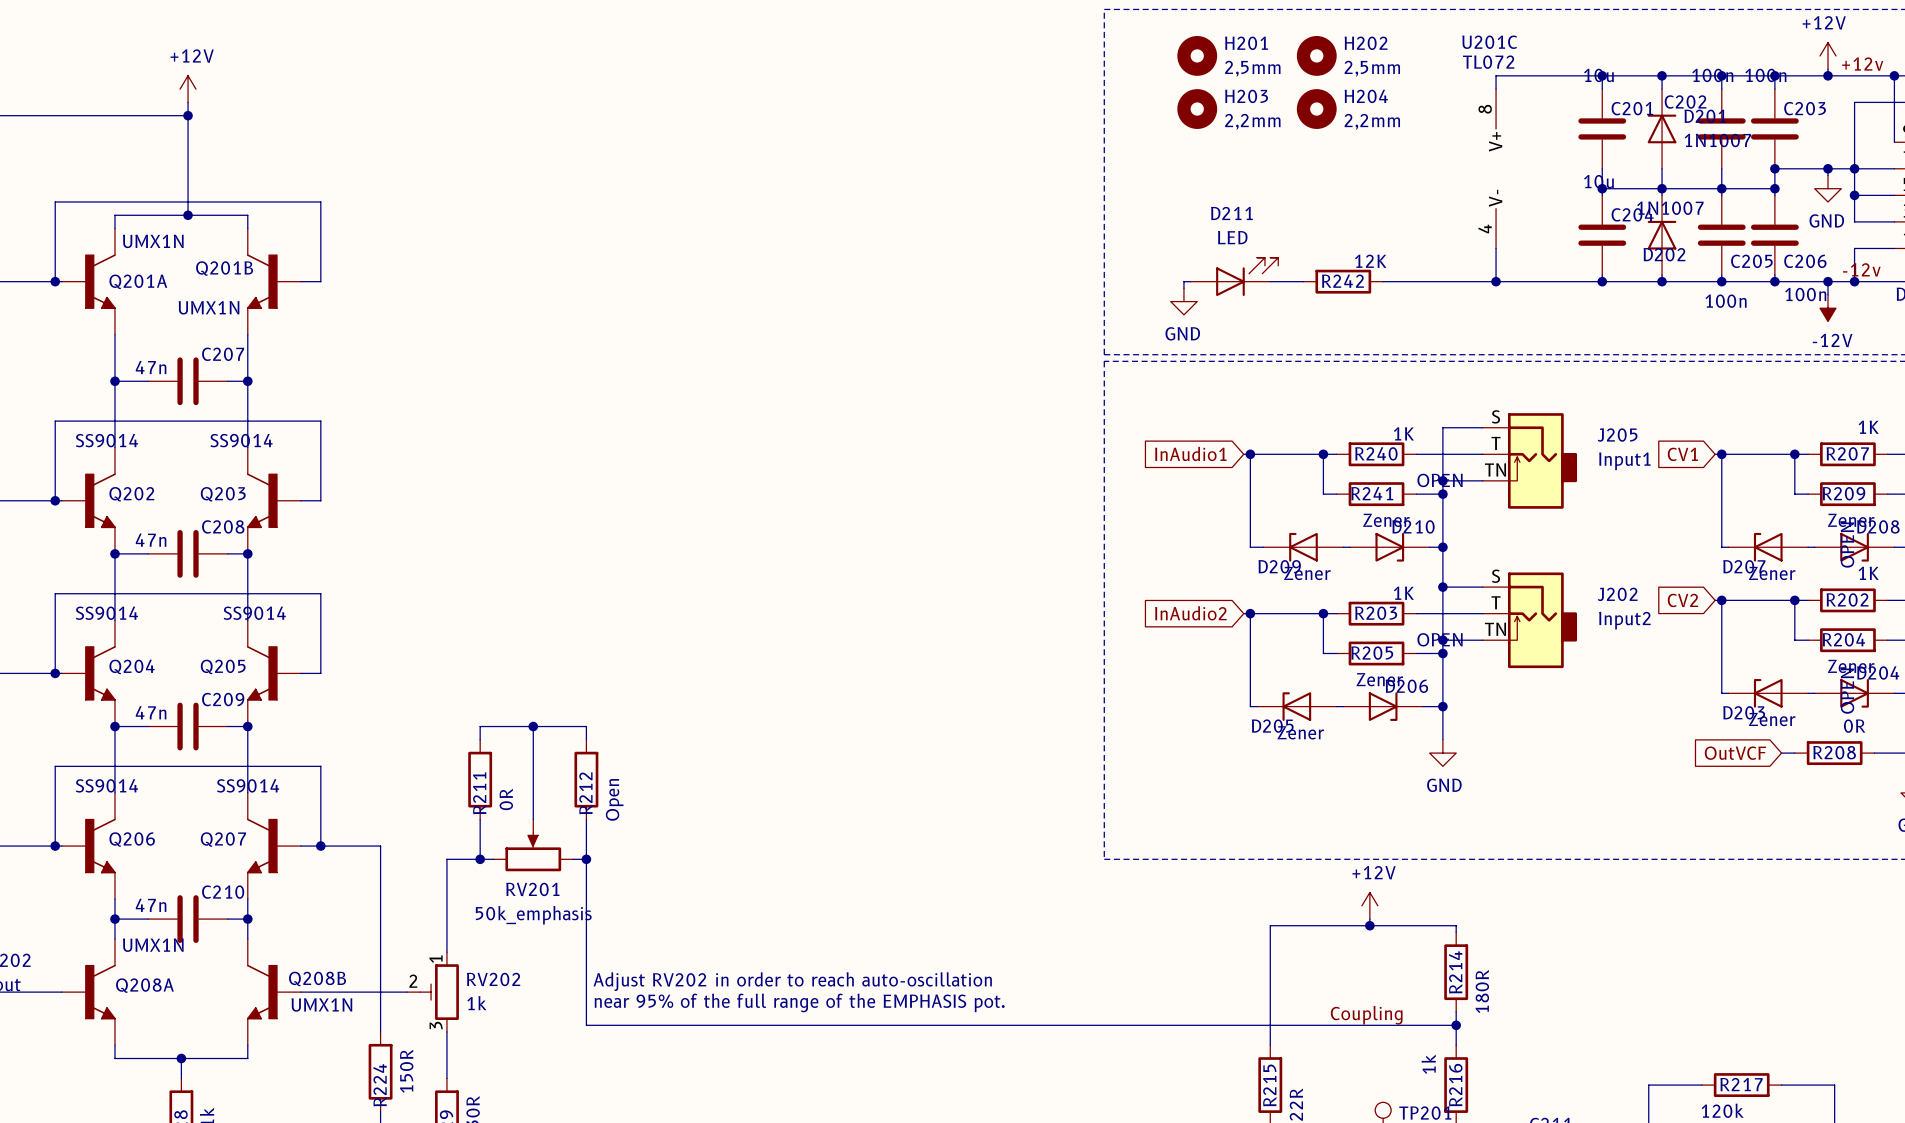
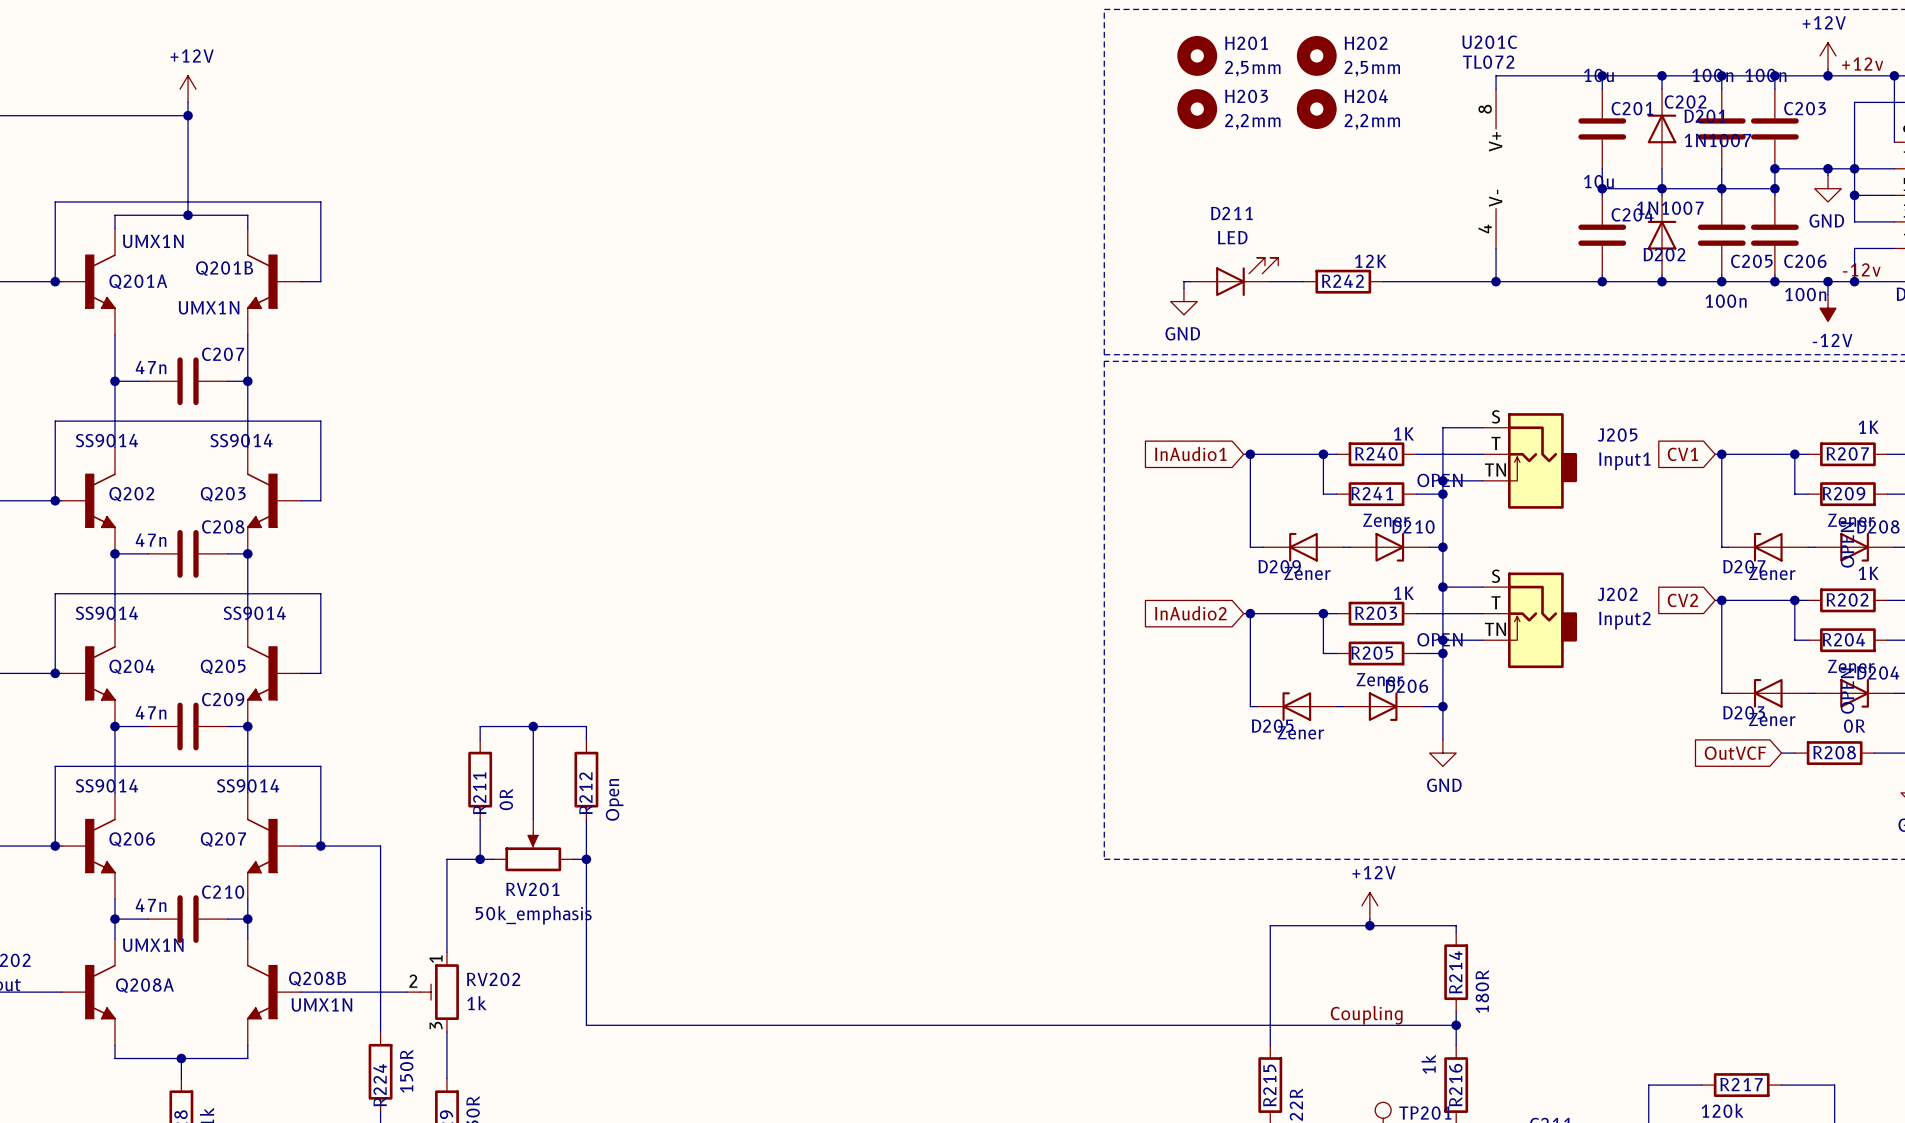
text: Adjust RV202 in order to reach auto-oscillation (792, 981) -> none
text: near 95% of the full range of the EMPHASIS pot. (799, 1002) -> none

